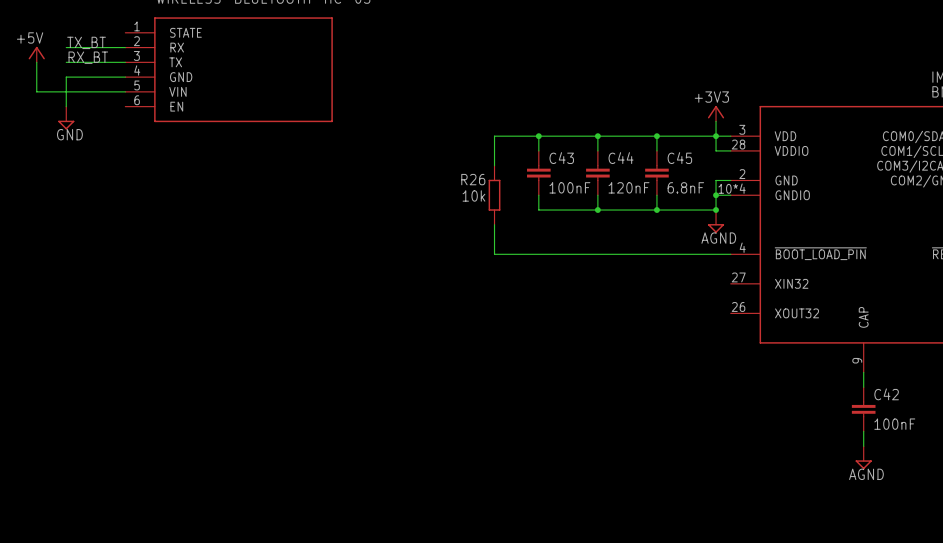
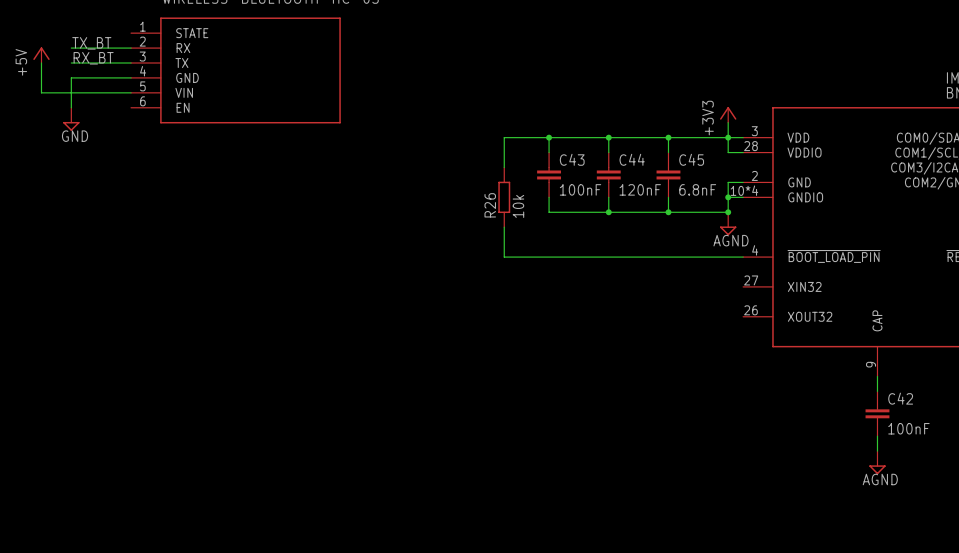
power symbol text rotation: 0° (30, 37) -> 90° counterclockwise (21, 62)
power symbol text rotation: 0° (711, 97) -> 90° counterclockwise (708, 118)
R26 name rotation: 0° (473, 179) -> 90° counterclockwise (490, 205)
R26 value rotation: 0° (473, 195) -> 90° counterclockwise (518, 206)
R26 value position: 10k (473, 195) -> 10k (518, 206)

